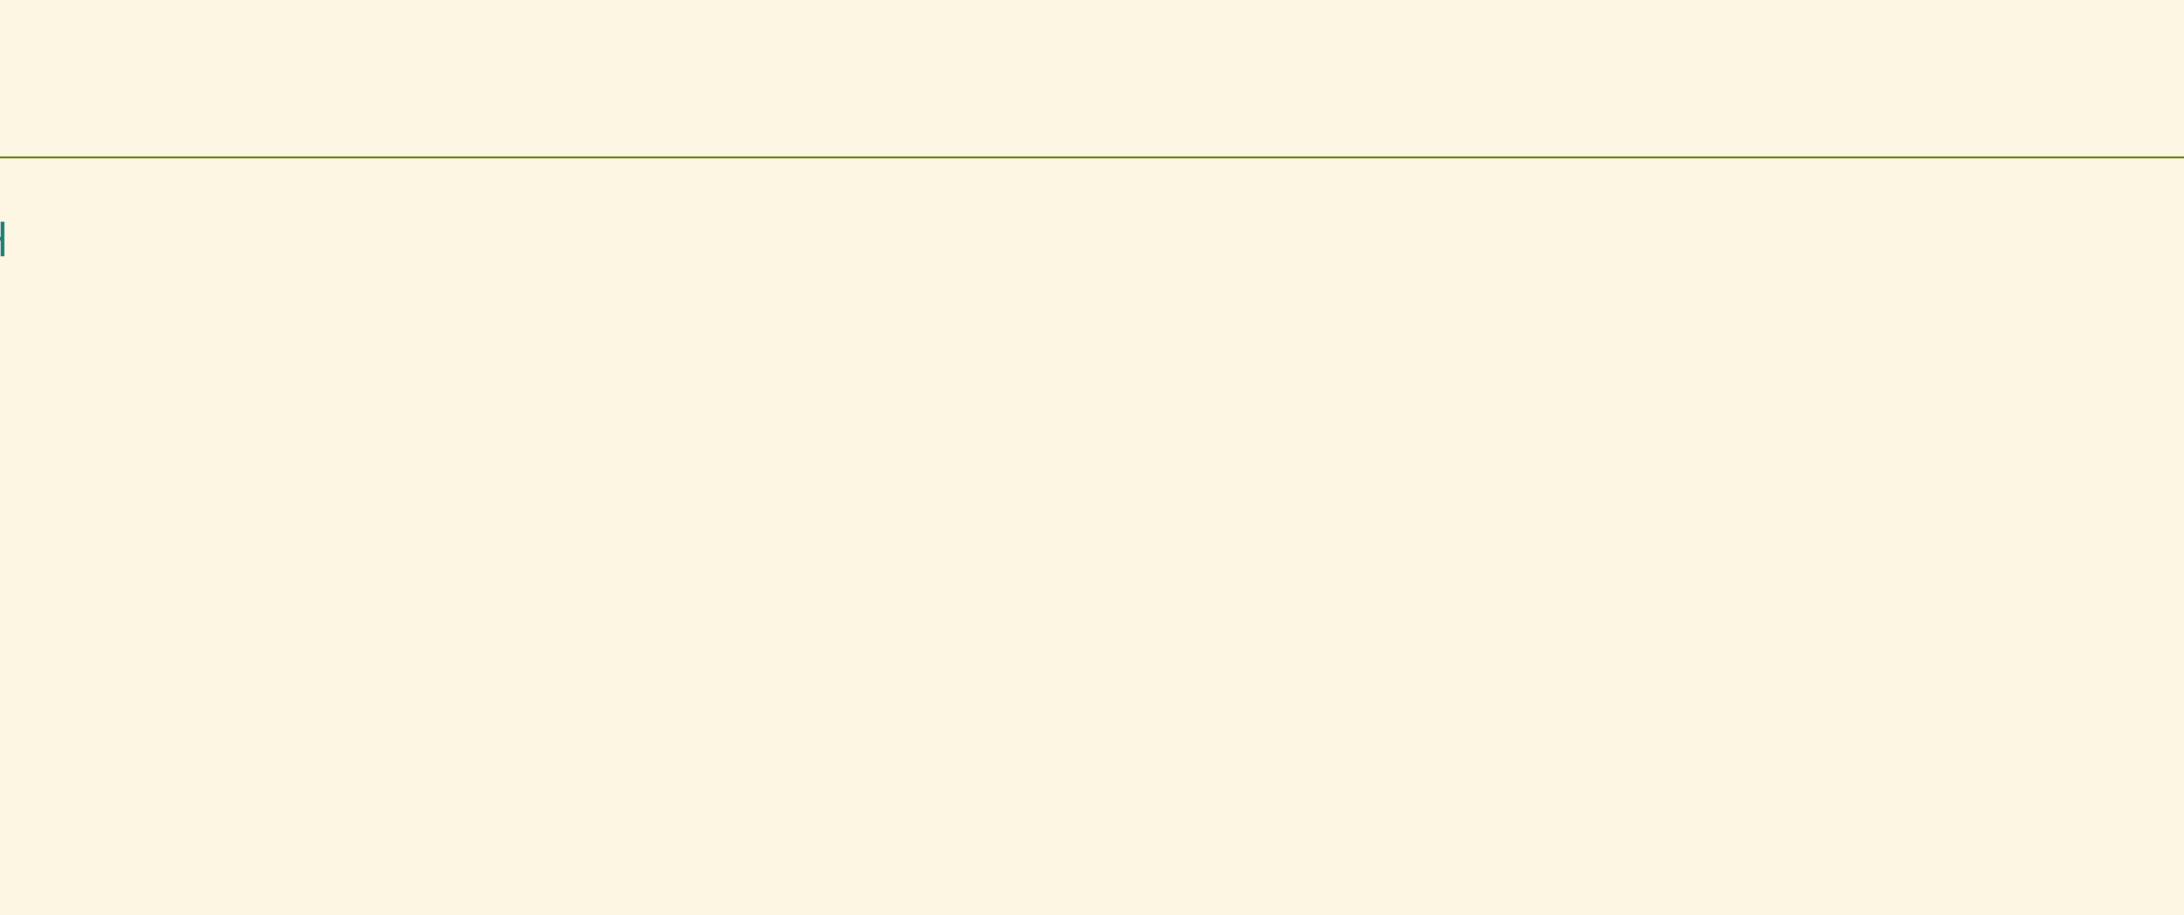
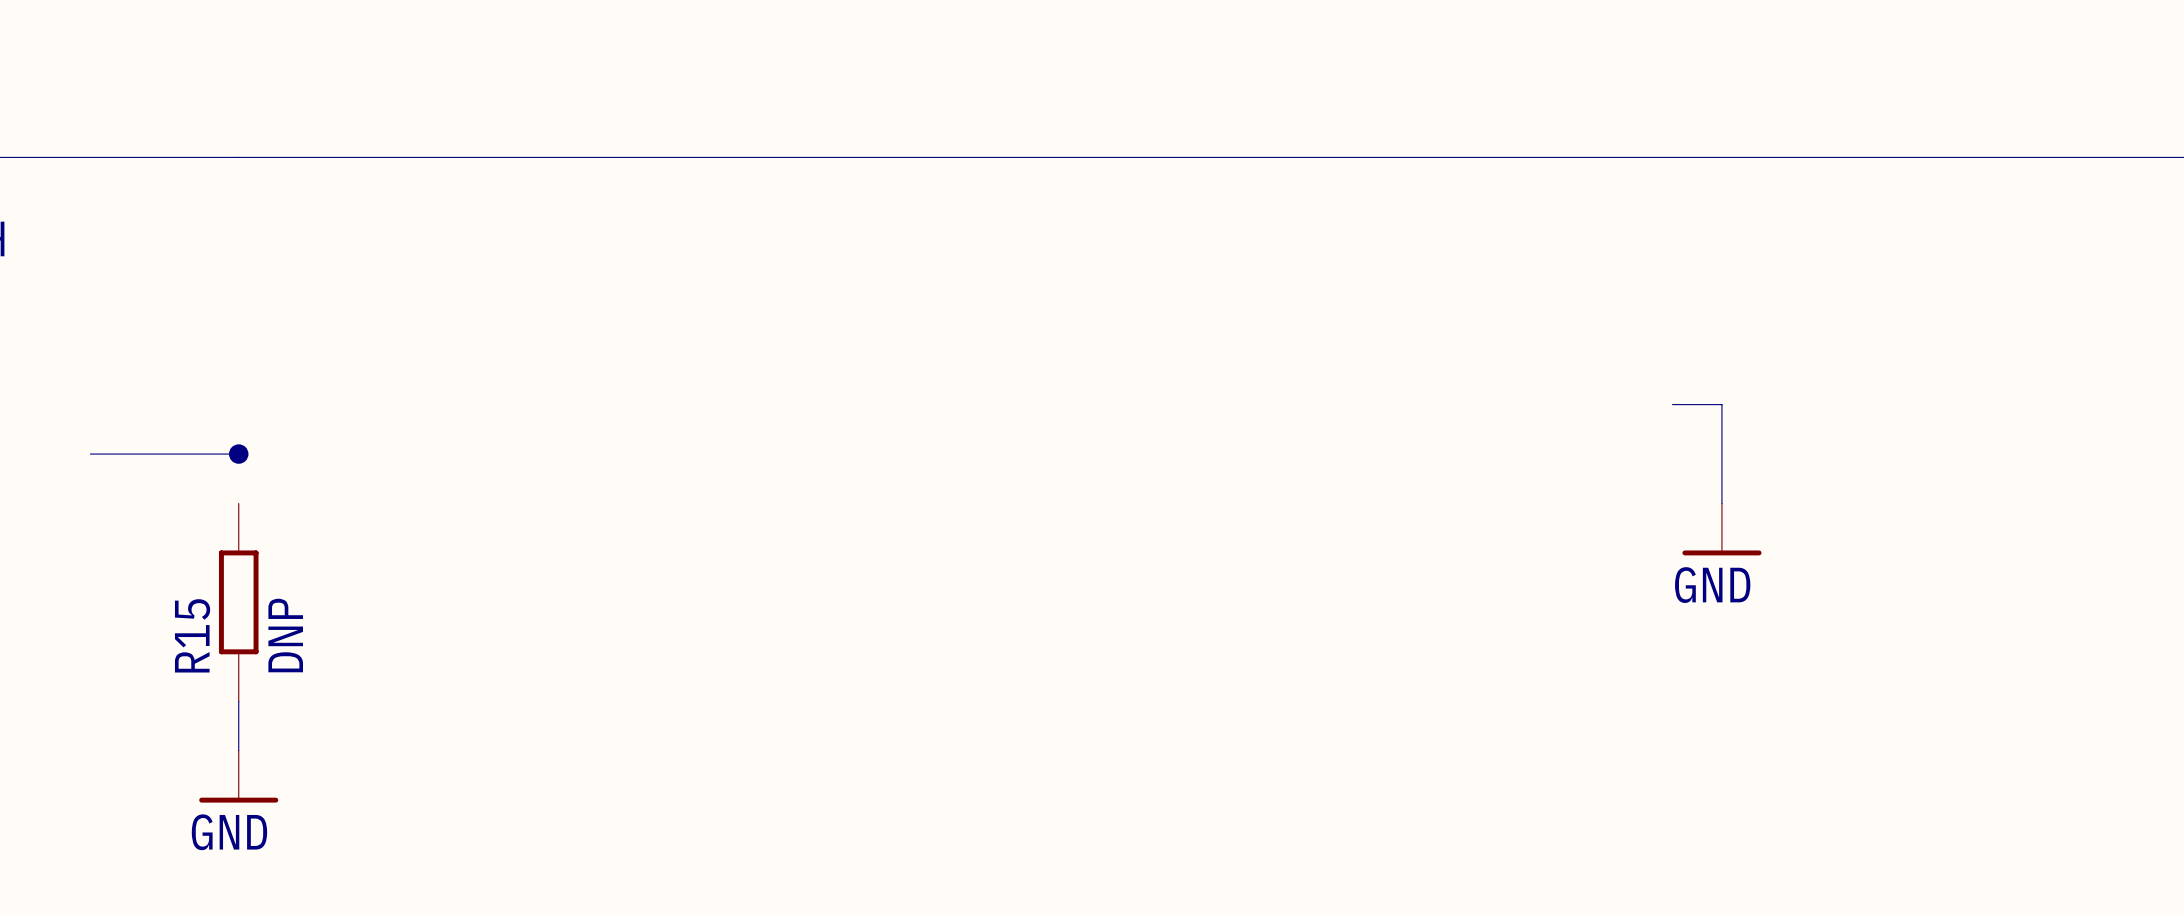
wire: none -> (1672, 404) (1721, 404) (1721, 503)
wire: none -> (90, 454) (238, 454)
junction: none -> (238, 454)
power symbol: none -> GND (1721, 529)
R15: none -> DNP (238, 602)
wire: none -> (238, 701) (238, 750)
power symbol: none -> GND (238, 776)

